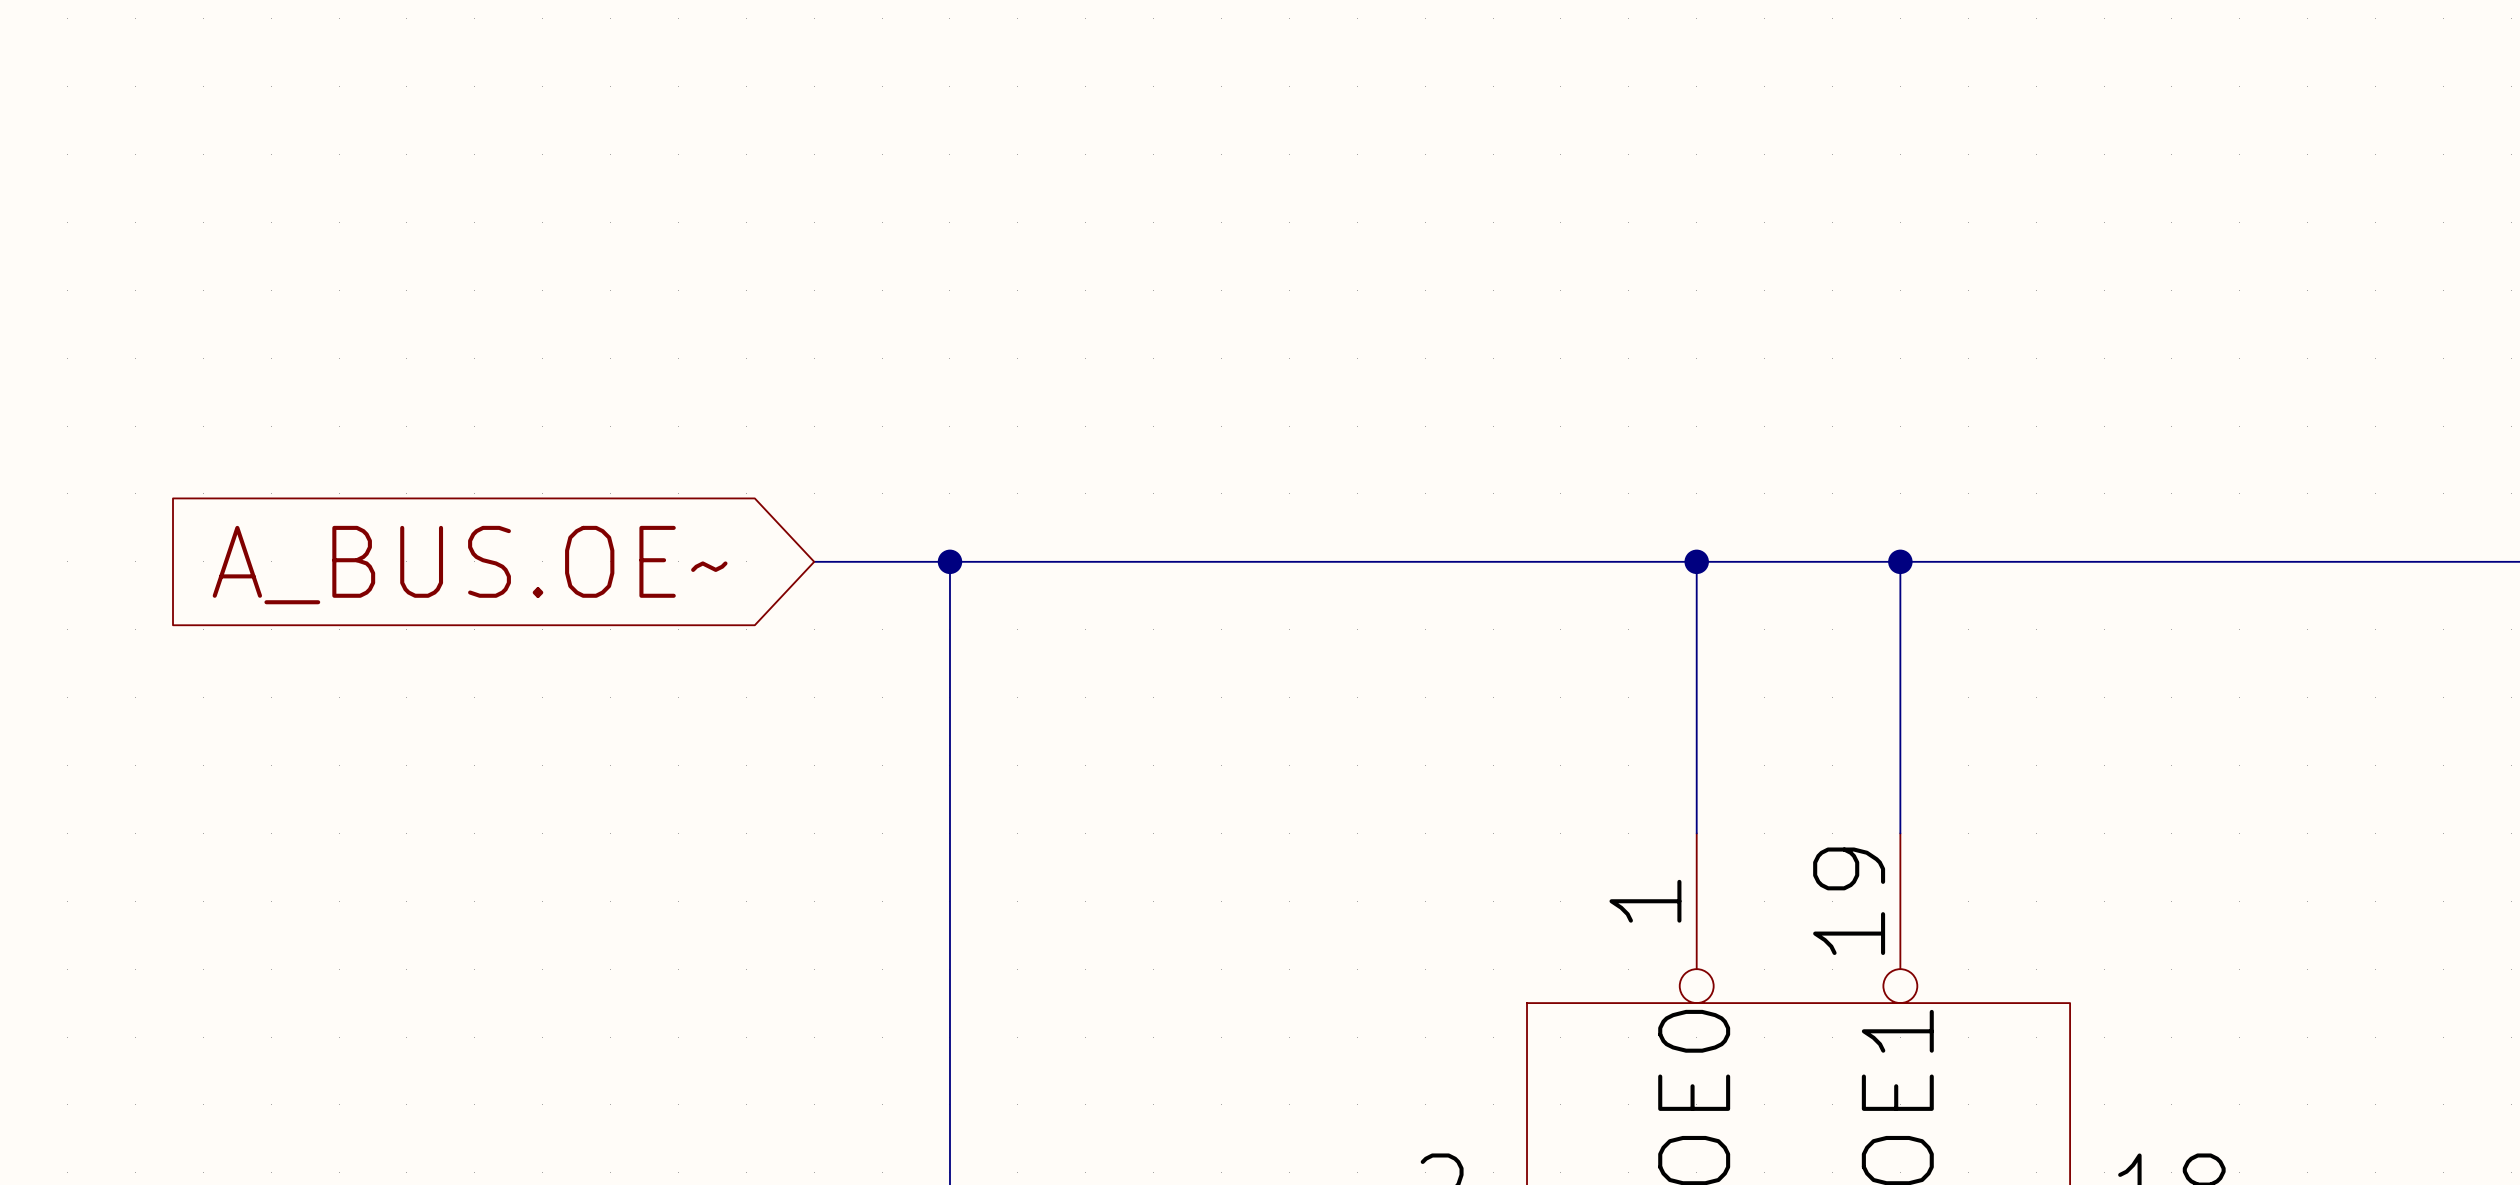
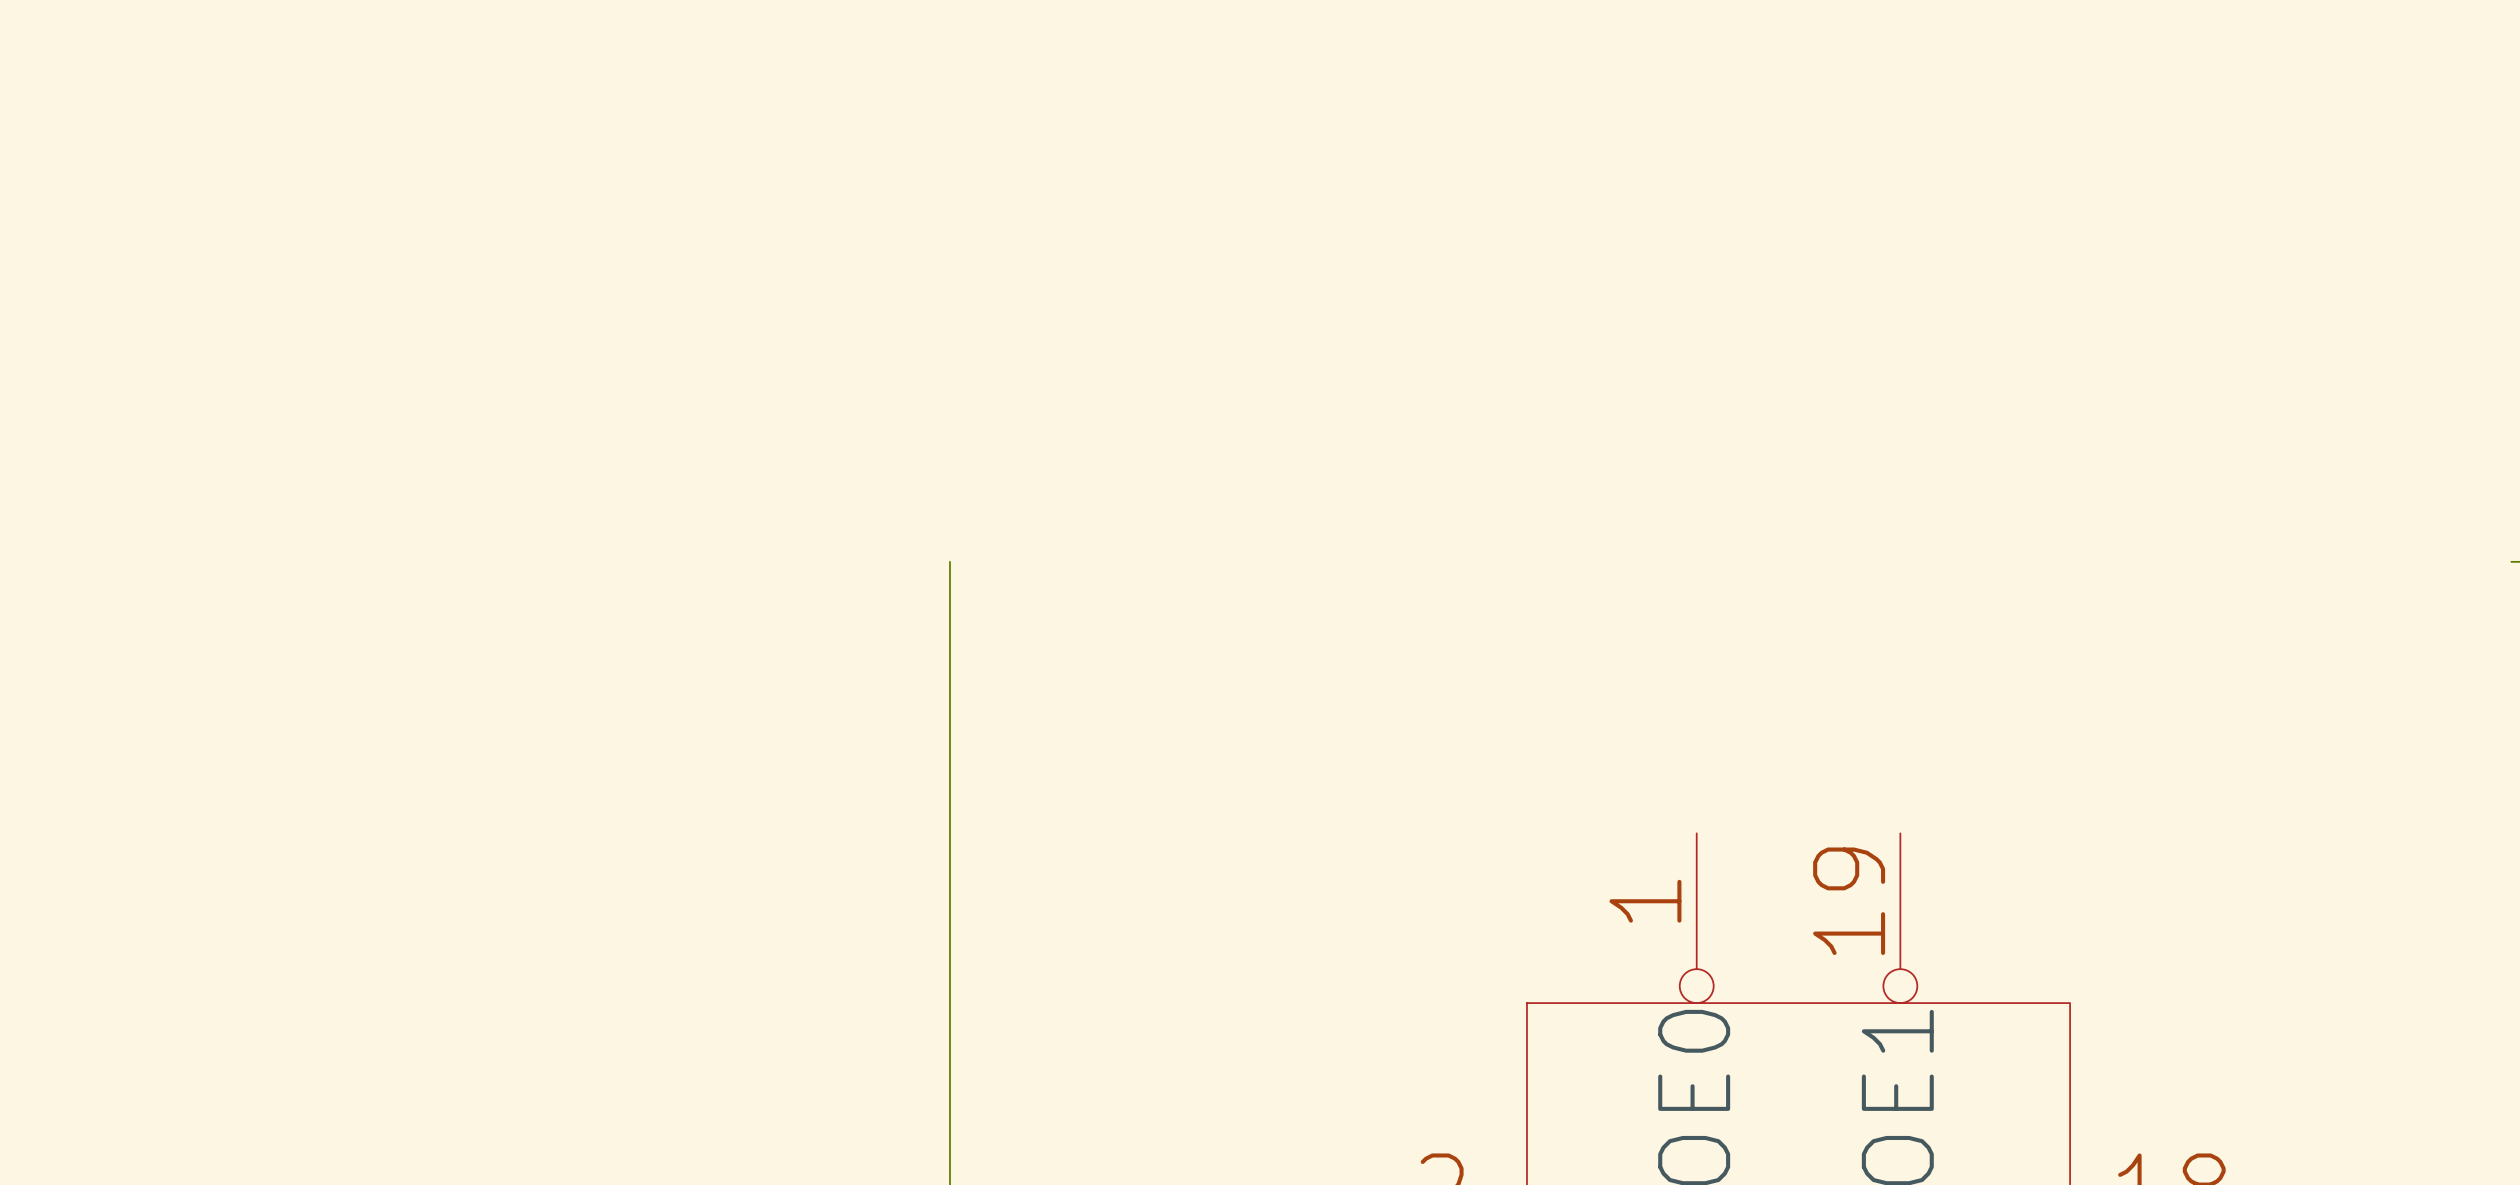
wire: (814, 561) (2511, 561) -> none
junction: (949, 561) -> none
wire: (1696, 561) (1696, 833) -> none
junction: (1696, 561) -> none
wire: (1900, 561) (1900, 833) -> none
junction: (1900, 561) -> none
global label: A_BUS.OE~ (470, 565) -> none

